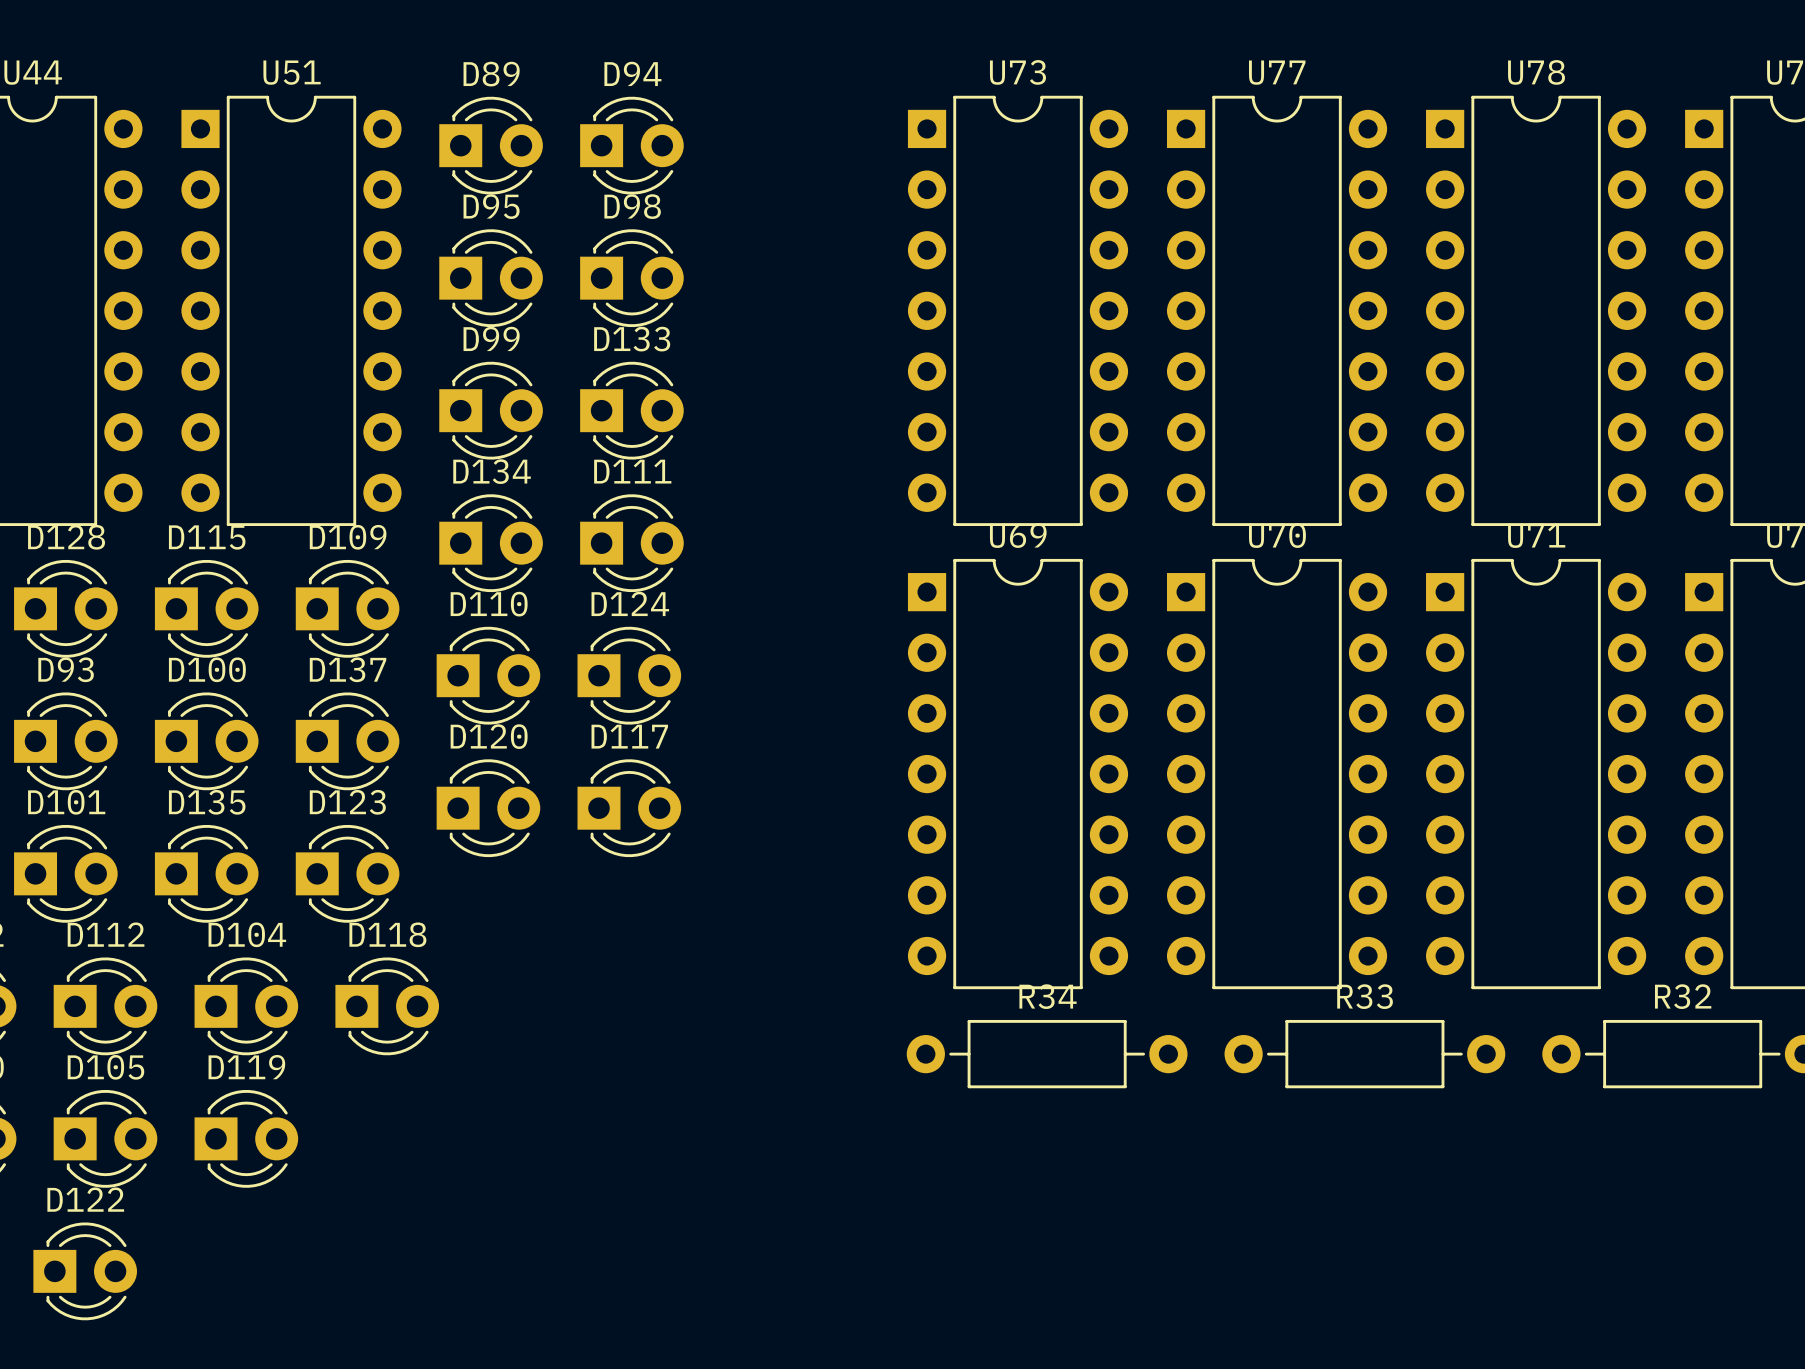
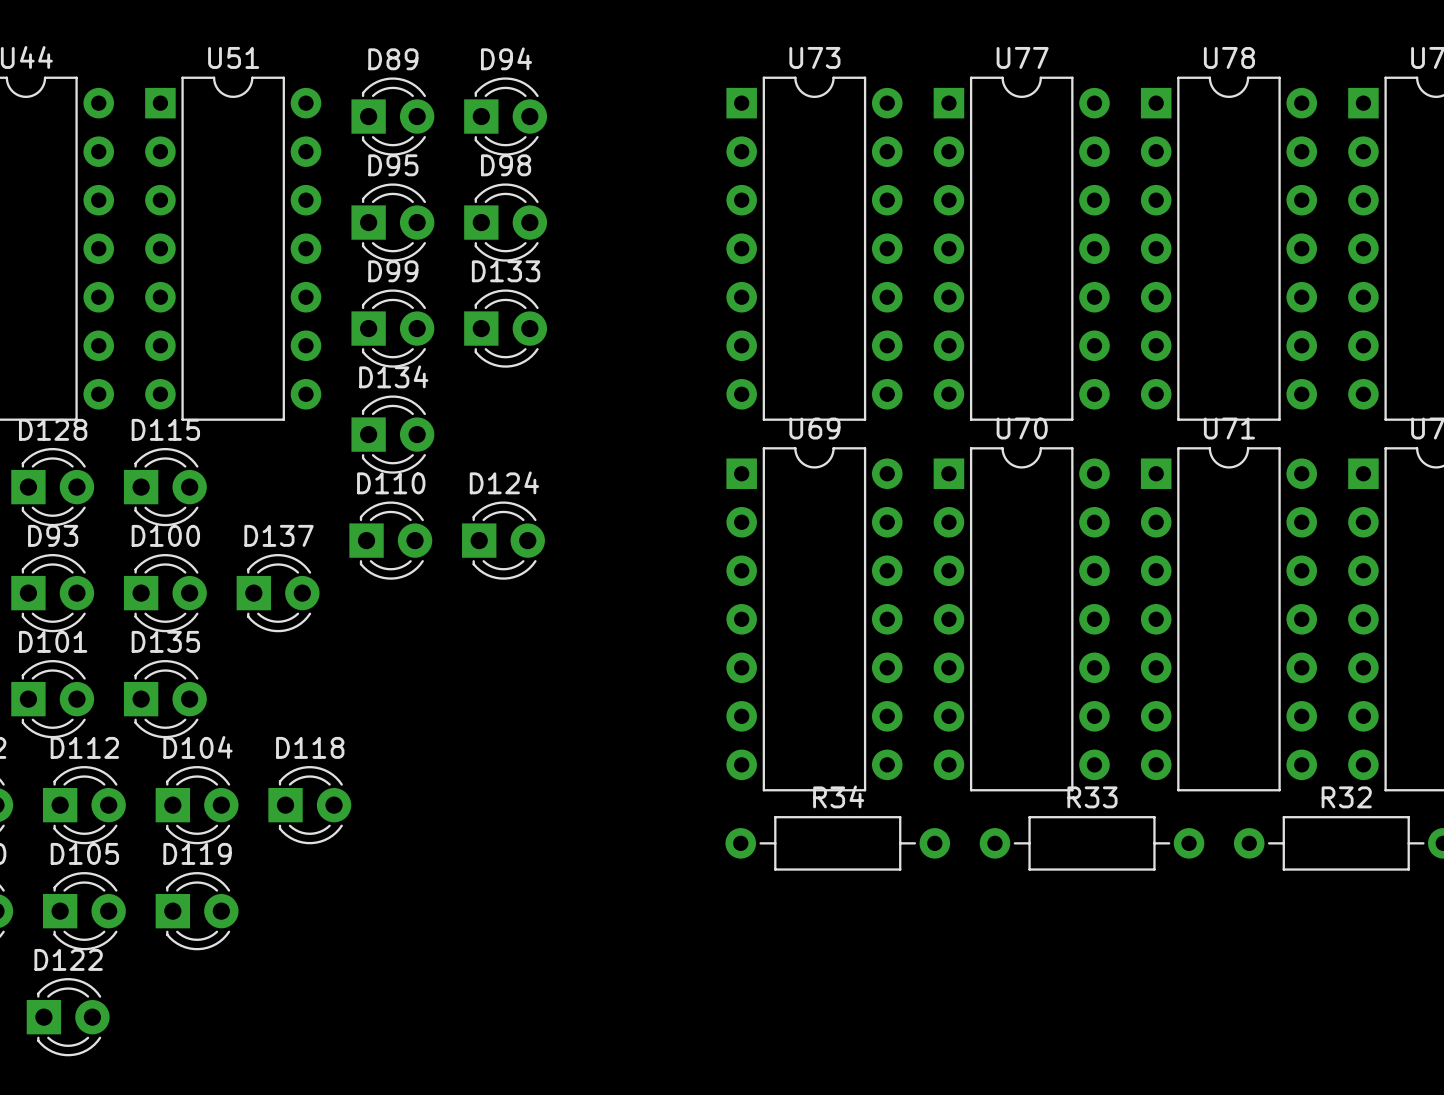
D111: (631, 543) -> none
D109: (347, 608) -> none
D120: (488, 808) -> none
D117: (629, 808) -> none
D123: (347, 873) -> none

